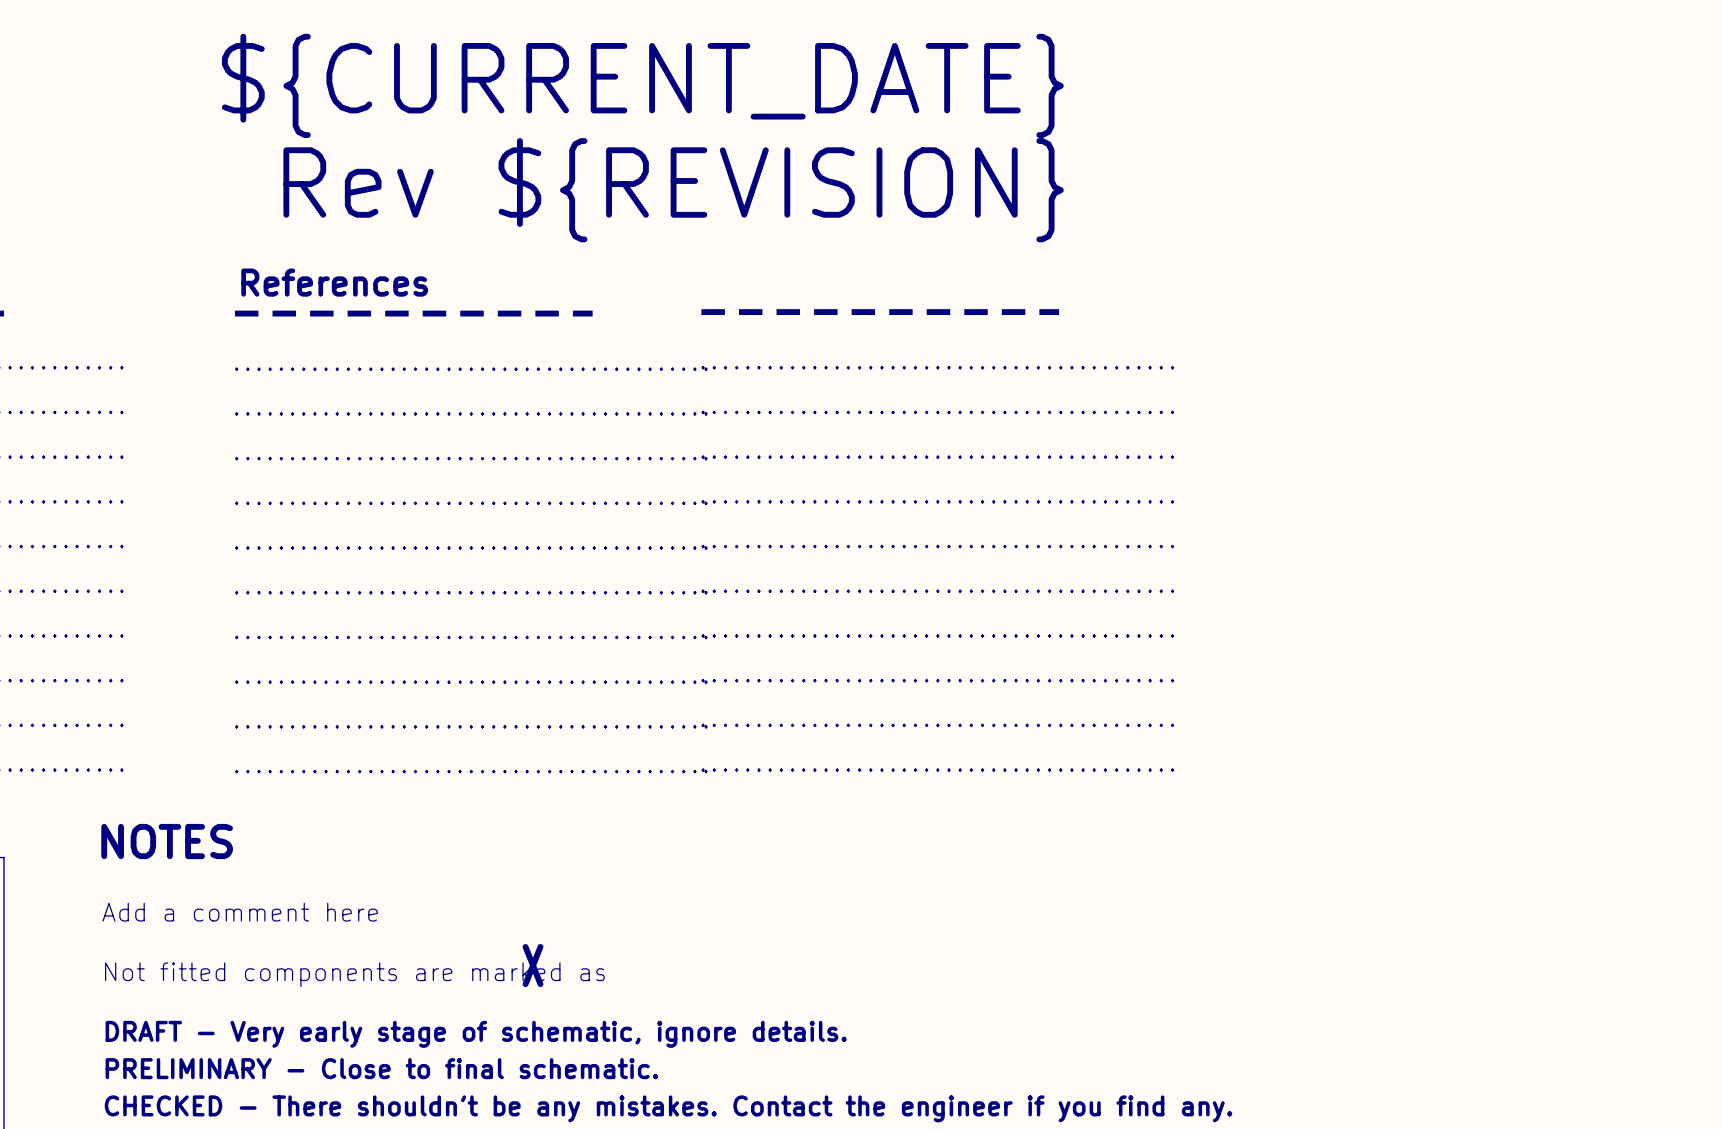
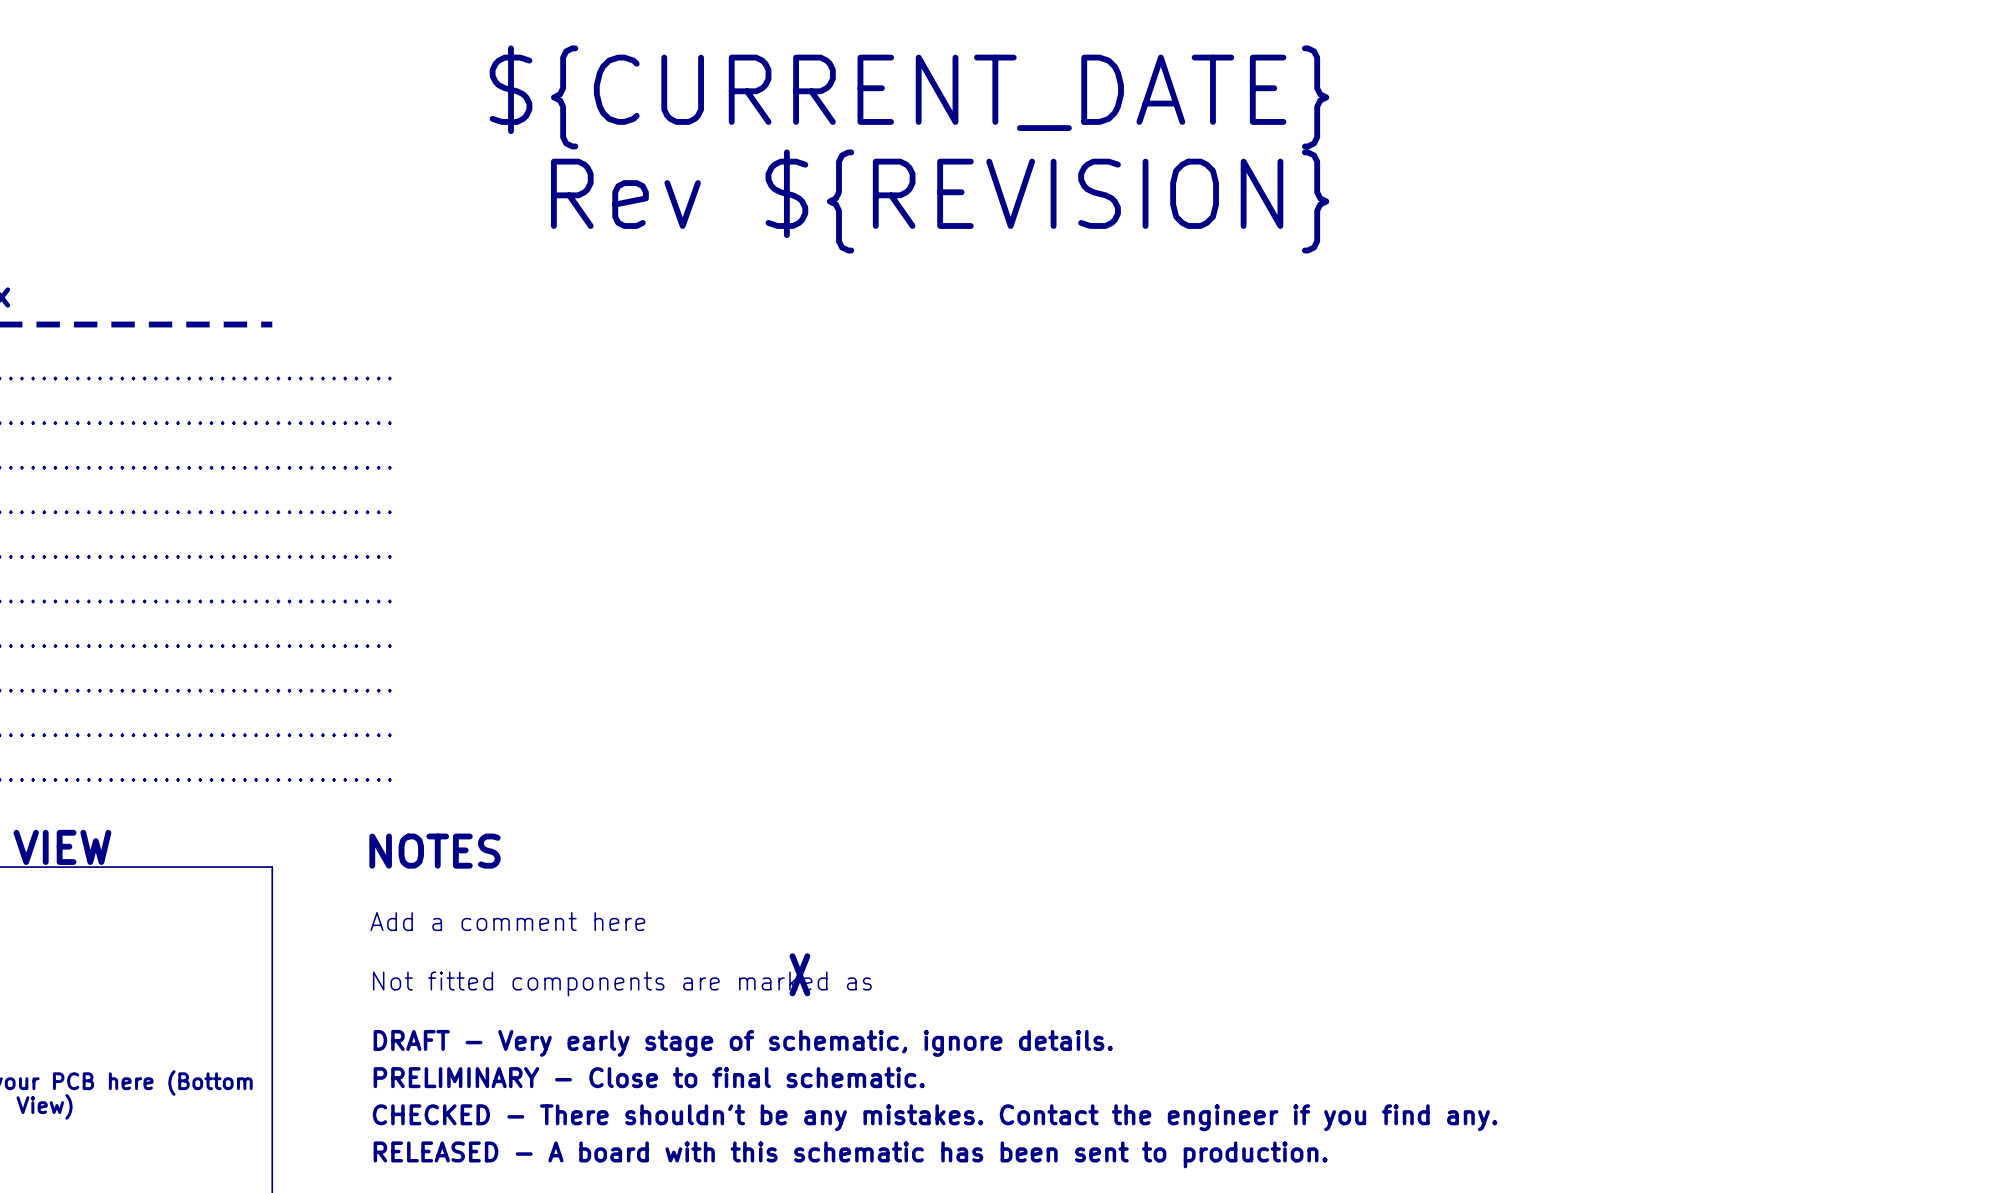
text: References (334, 282) -> none
line: (701, 312) (1059, 312) -> none
line: (234, 313) (592, 313) -> none
text: ........................................... (937, 367) -> none
text: ........................................... (471, 369) -> none
text: ........................................... (937, 412) -> none
text: ........................................... (471, 413) -> none
text: ........................................... (937, 457) -> none
text: ........................................... (471, 458) -> none
text: ........................................... (937, 501) -> none
text: ........................................... (471, 503) -> none
text: ........................................... (937, 546) -> none
text: ........................................... (471, 548) -> none
text: ........................................... (937, 591) -> none
text: ........................................... (471, 592) -> none
text: ........................................... (937, 635) -> none
text: ........................................... (471, 637) -> none
text: ........................................... (937, 680) -> none
text: ........................................... (471, 682) -> none
text: ........................................... (937, 725) -> none
text: ........................................... (471, 726) -> none
text: ........................................... (937, 770) -> none
text: ........................................... (471, 771) -> none

